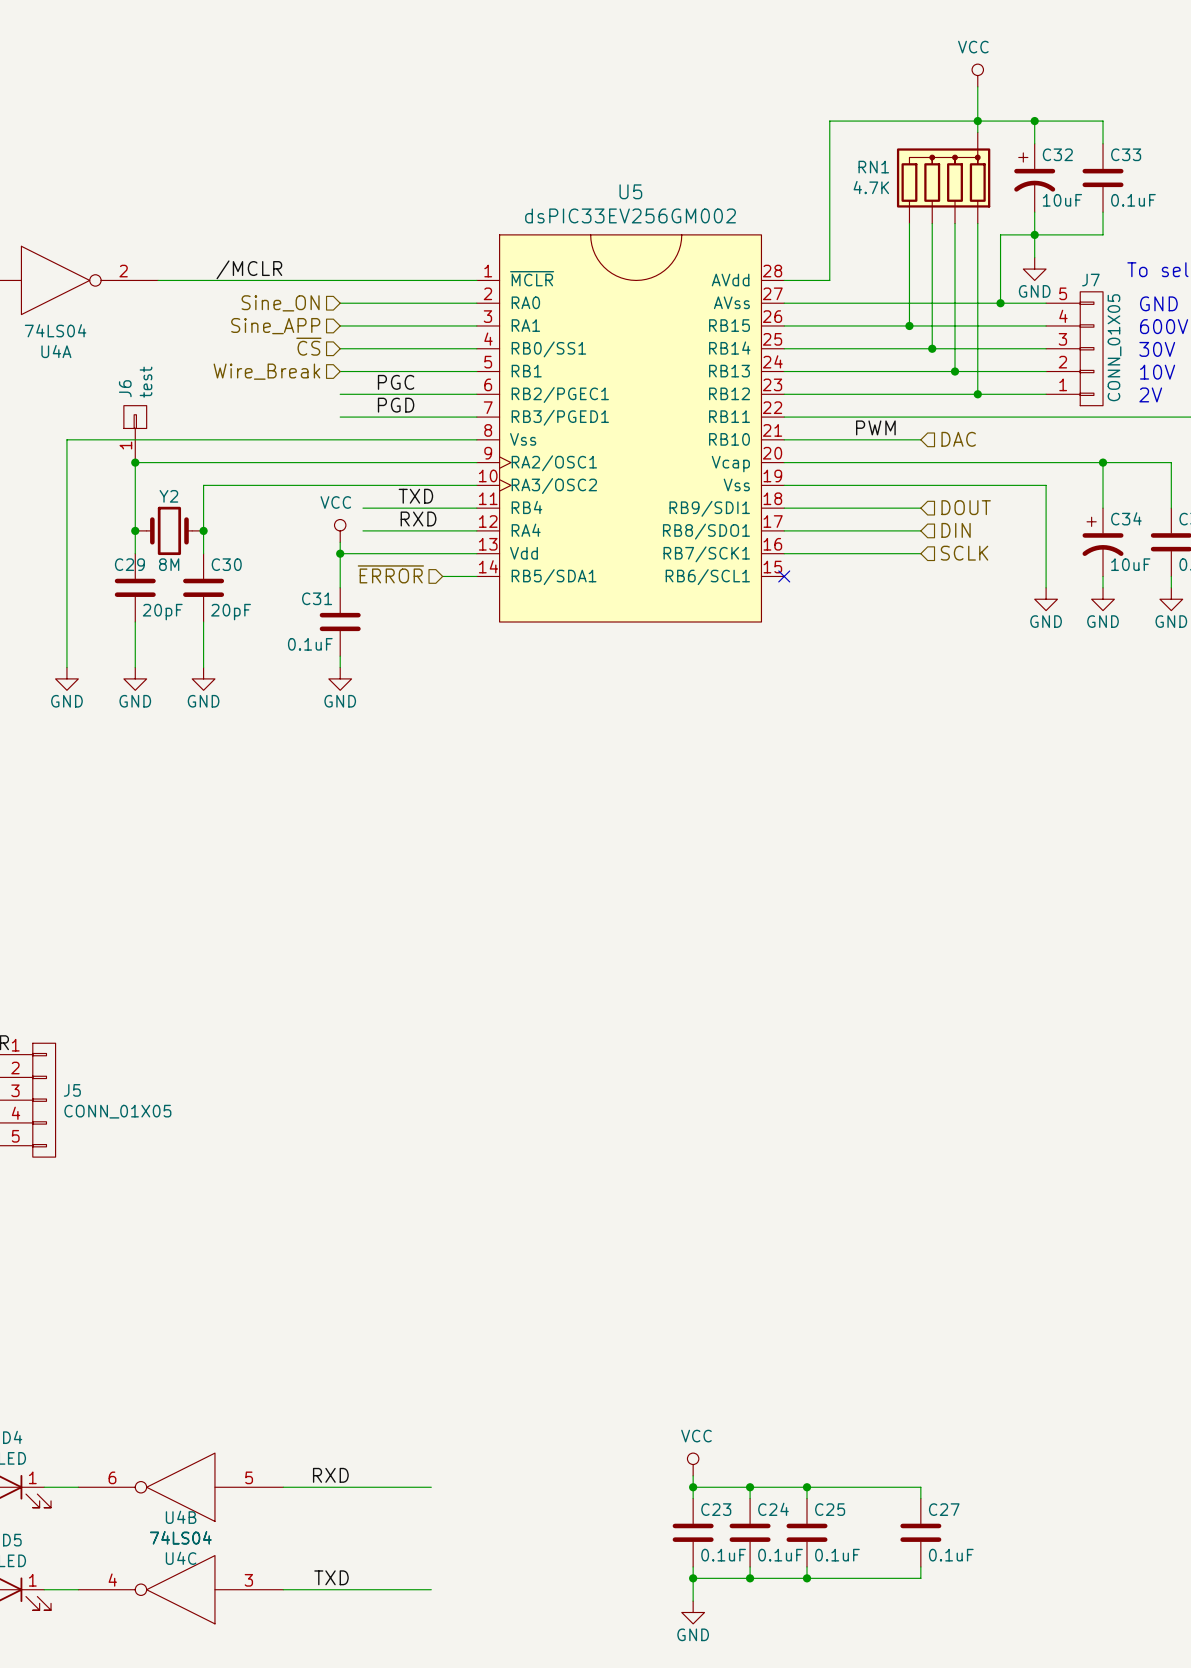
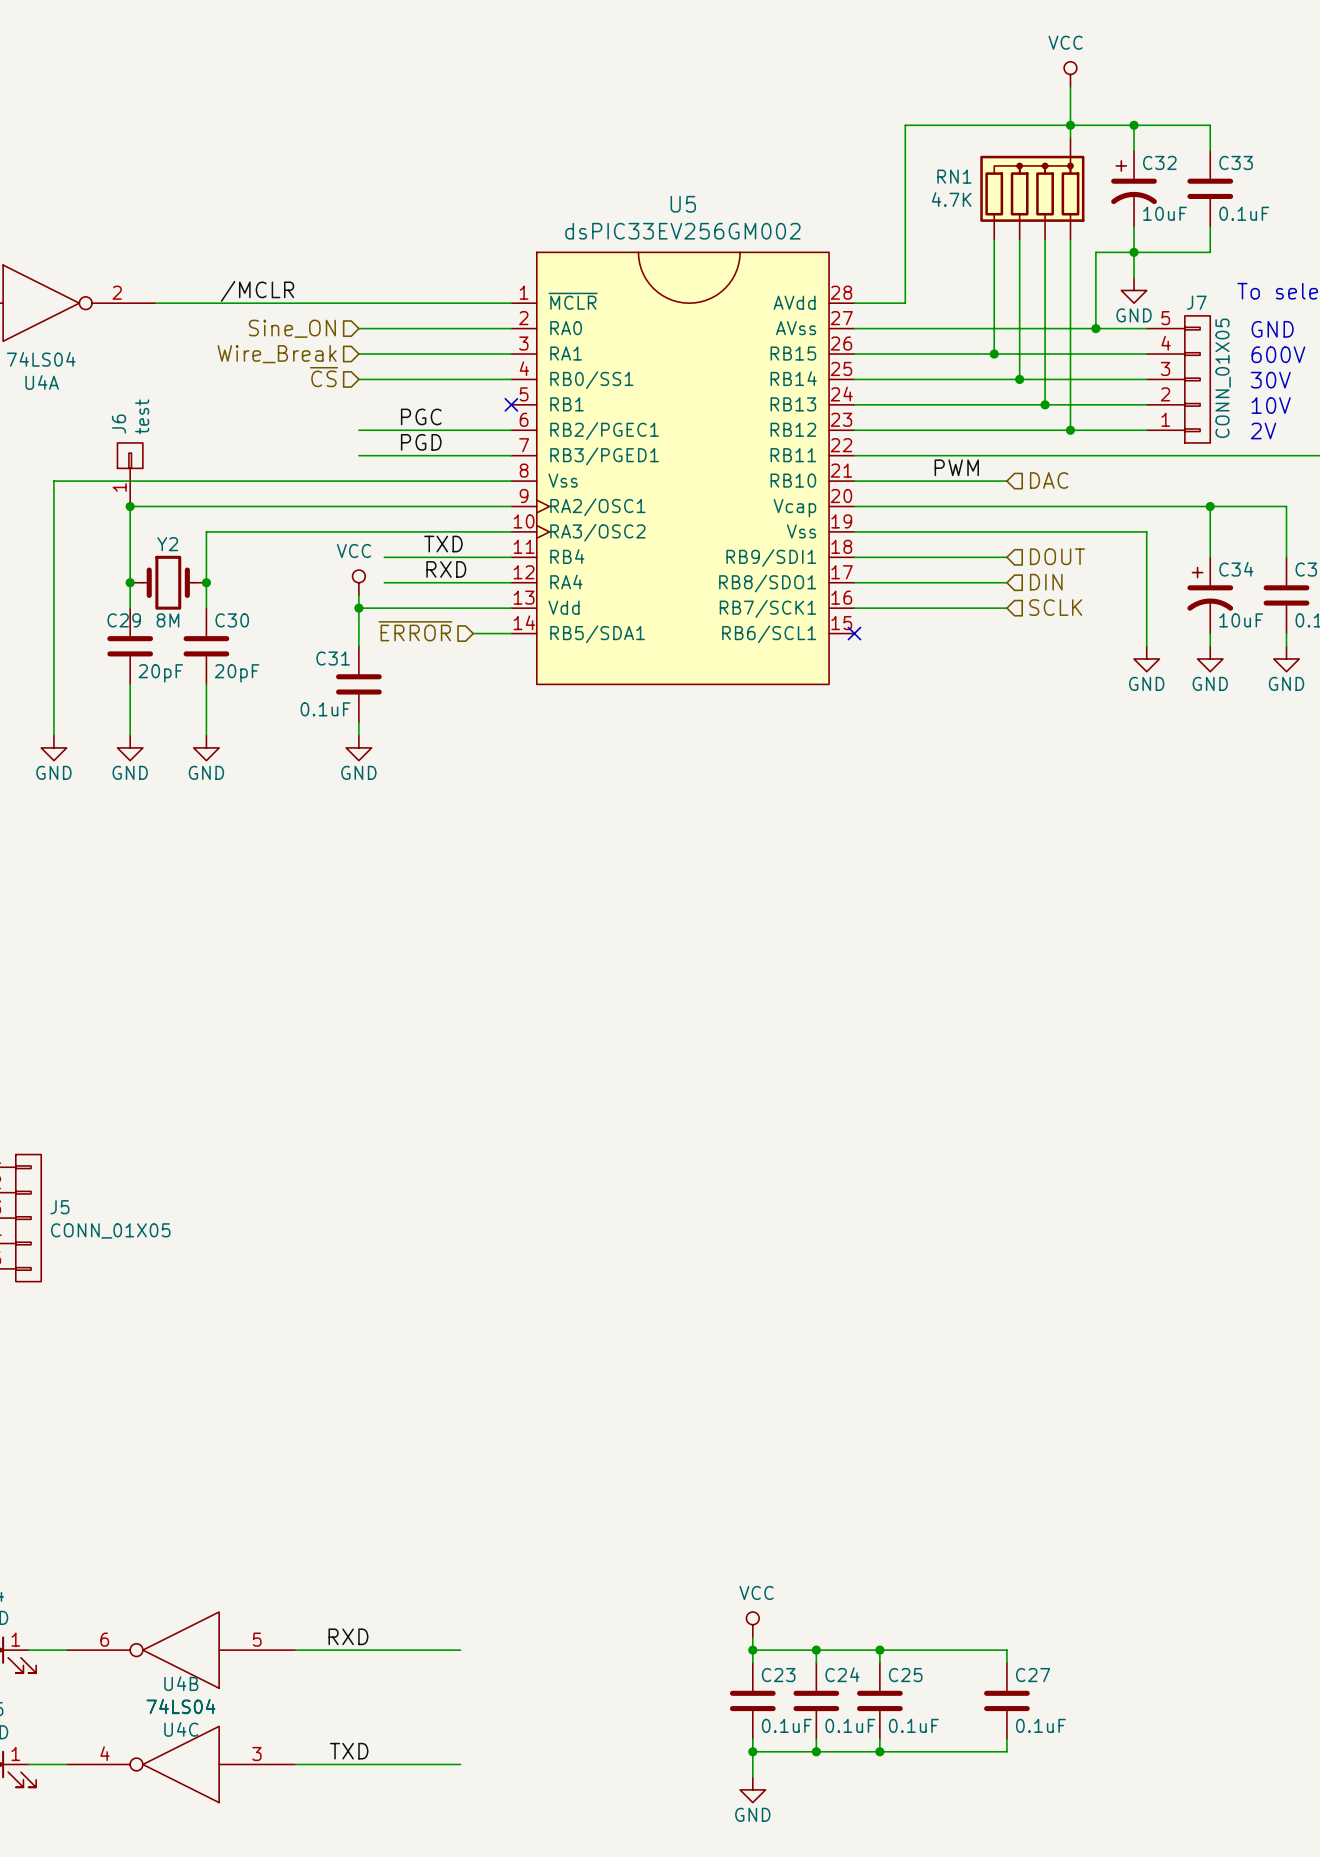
hierarchical label: Sine_APP (275, 326) -> Wire_Break (277, 354)
hierarchical label: Wire_Break (266, 371) -> none
wire: (340, 371) (476, 371) -> none
no-connect mark: none -> (511, 404)

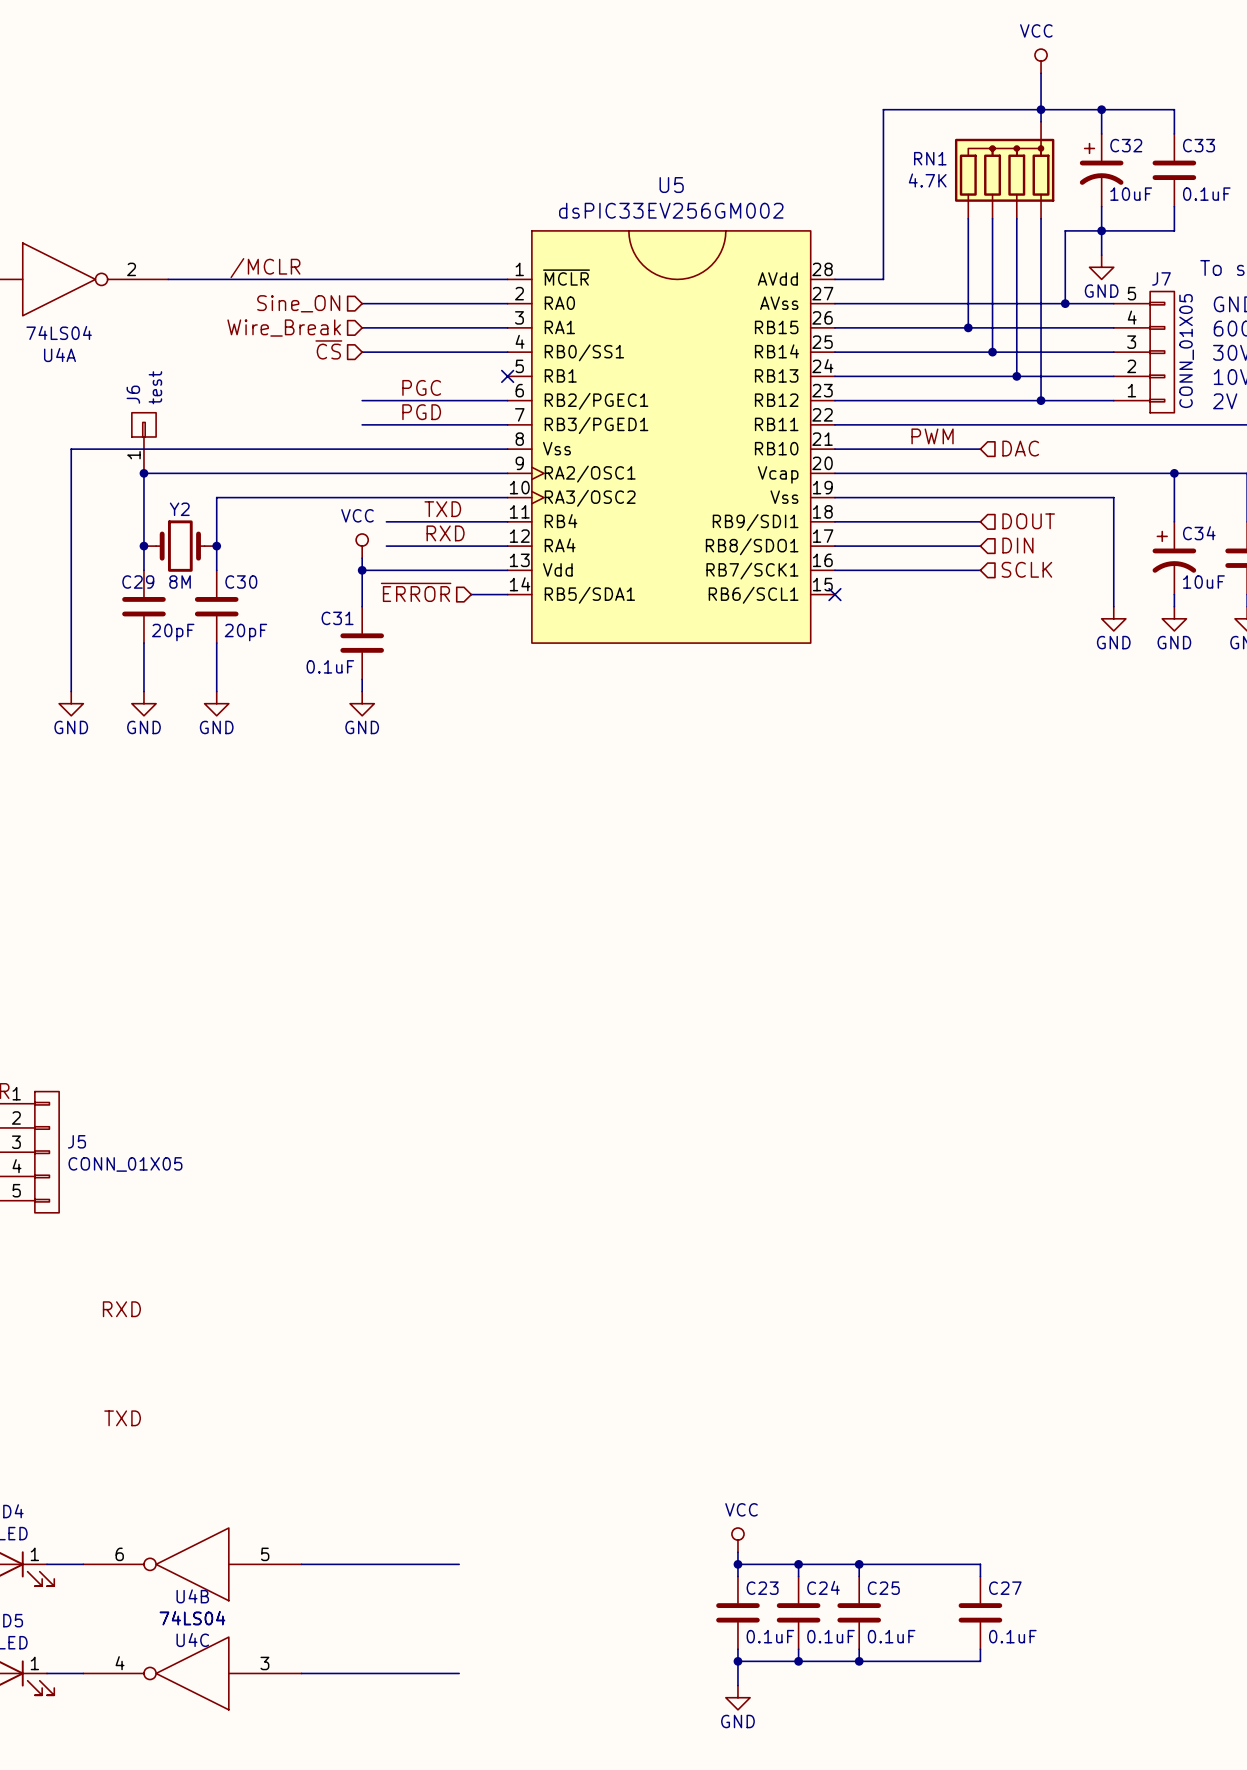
label: none -> RXD (121, 1309)
label: none -> TXD (122, 1418)
label: RXD (348, 1636) -> none
label: TXD (349, 1751) -> none

